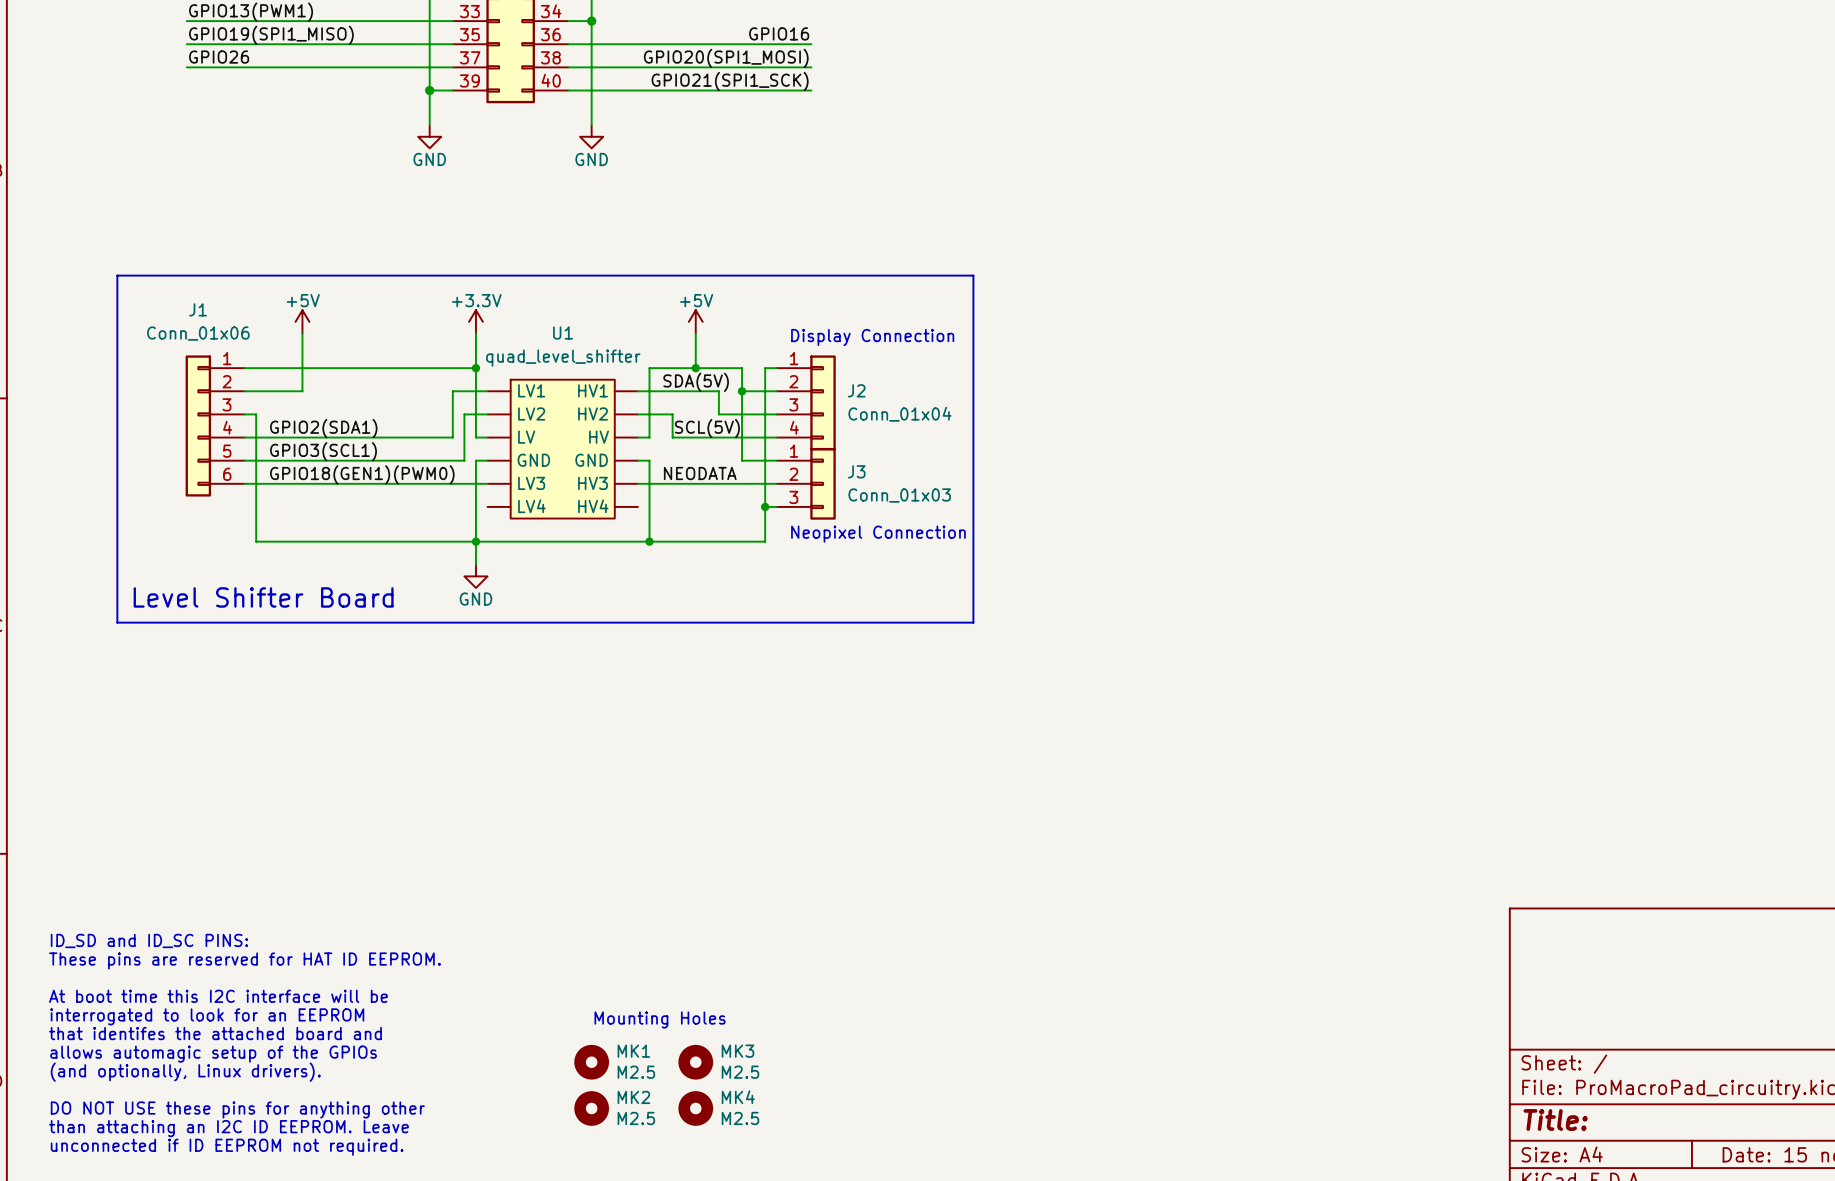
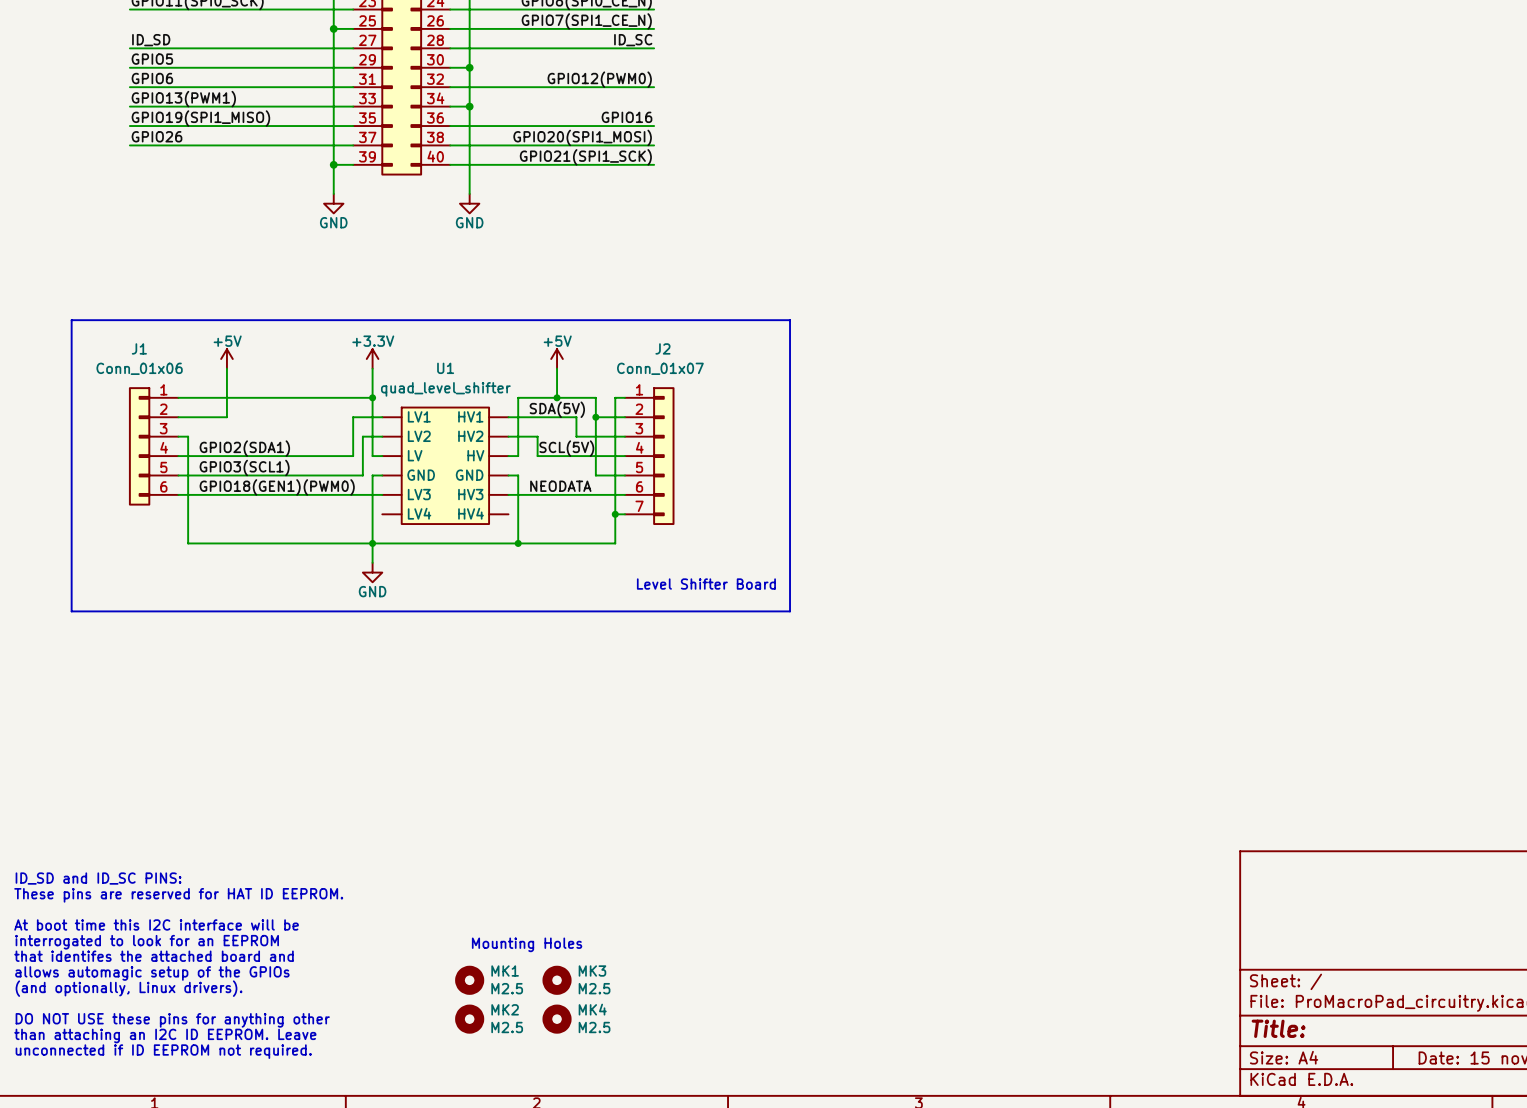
text: Display Connection (872, 337) -> none
J2 symbol: [776, 355, 836, 451] -> [624, 387, 675, 526]
J2 name position: J2 (856, 390) -> J2 (662, 348)
J2 value: Conn_01x04 (899, 414) -> Conn_01x07 (660, 368)
J3: Conn_01x03 (806, 483) -> none
text: Neopixel Connection (878, 534) -> none
text: none -> Level Shifter Board (706, 584)
text: Level Shifter Board (263, 597) -> none

